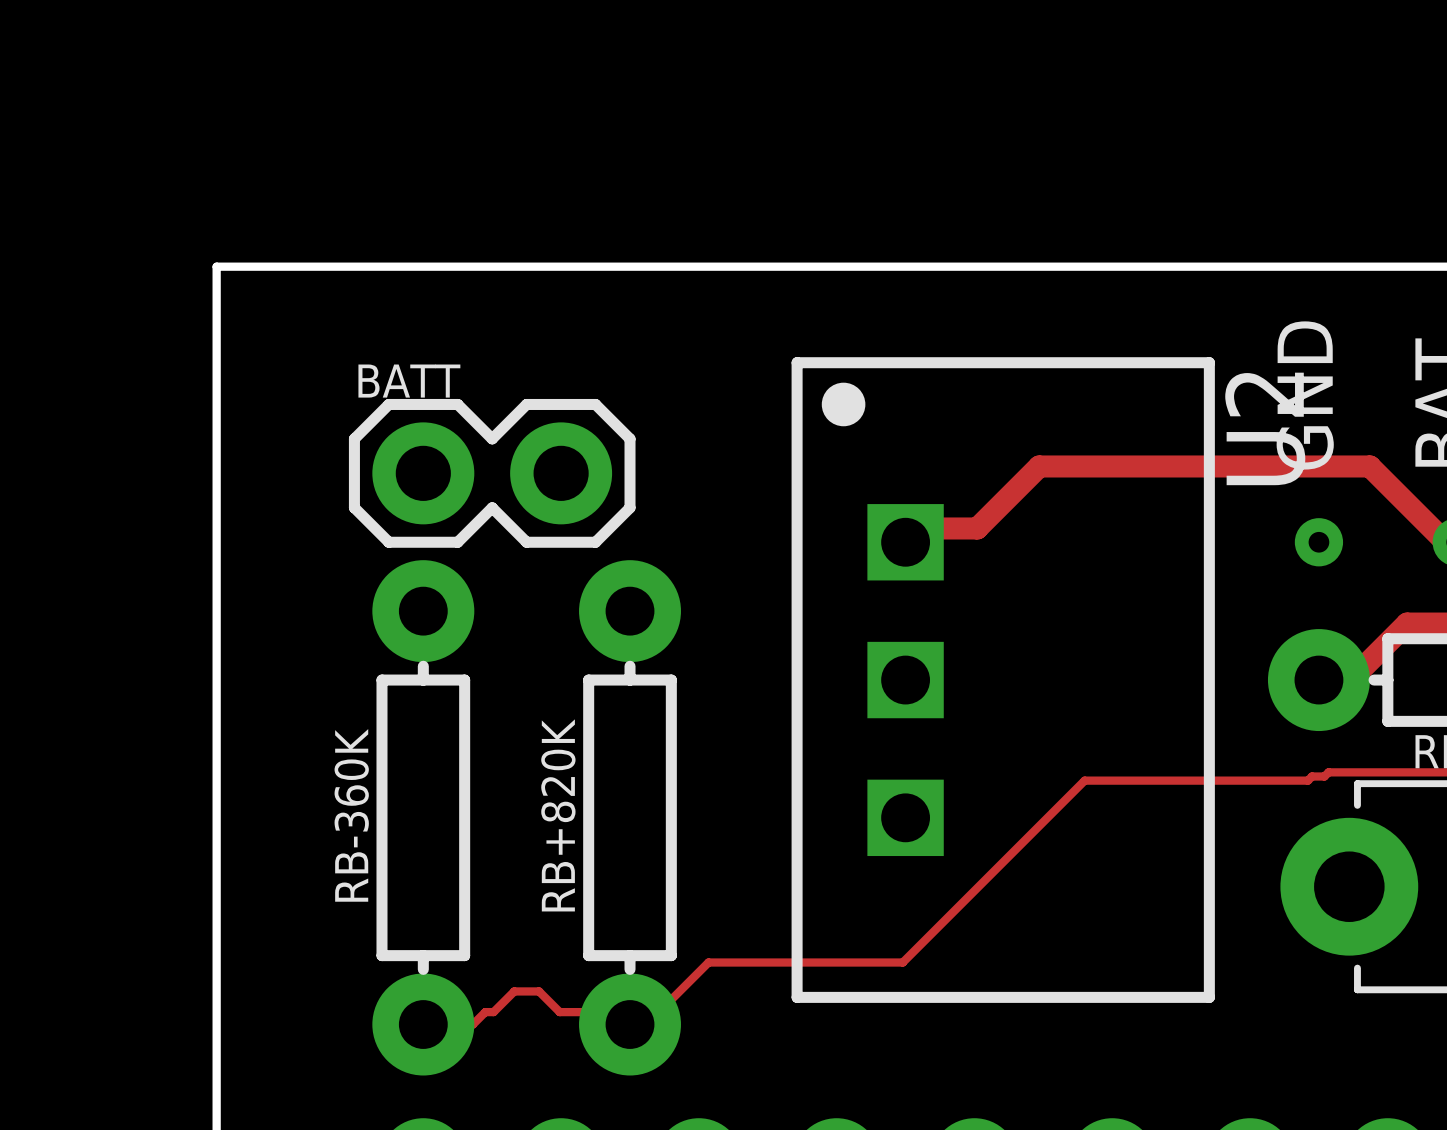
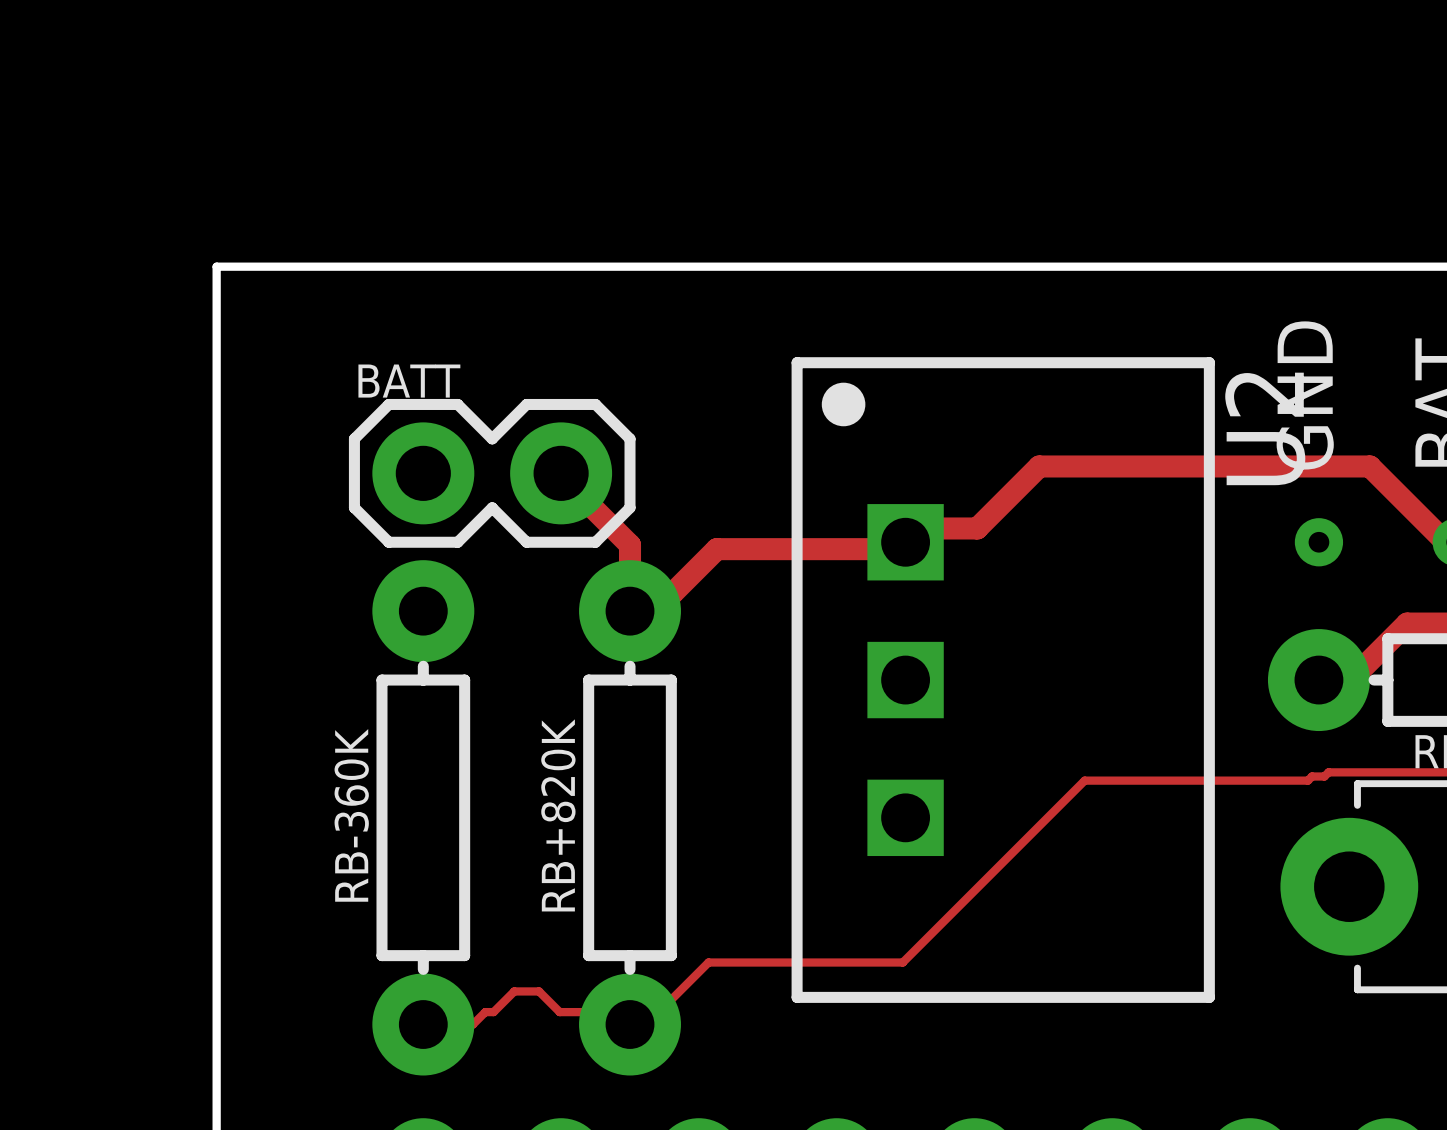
track: none -> (561, 473) (559, 474) (630, 545) (630, 611) (638, 594) (671, 594) (716, 549) (898, 549) (905, 542)

